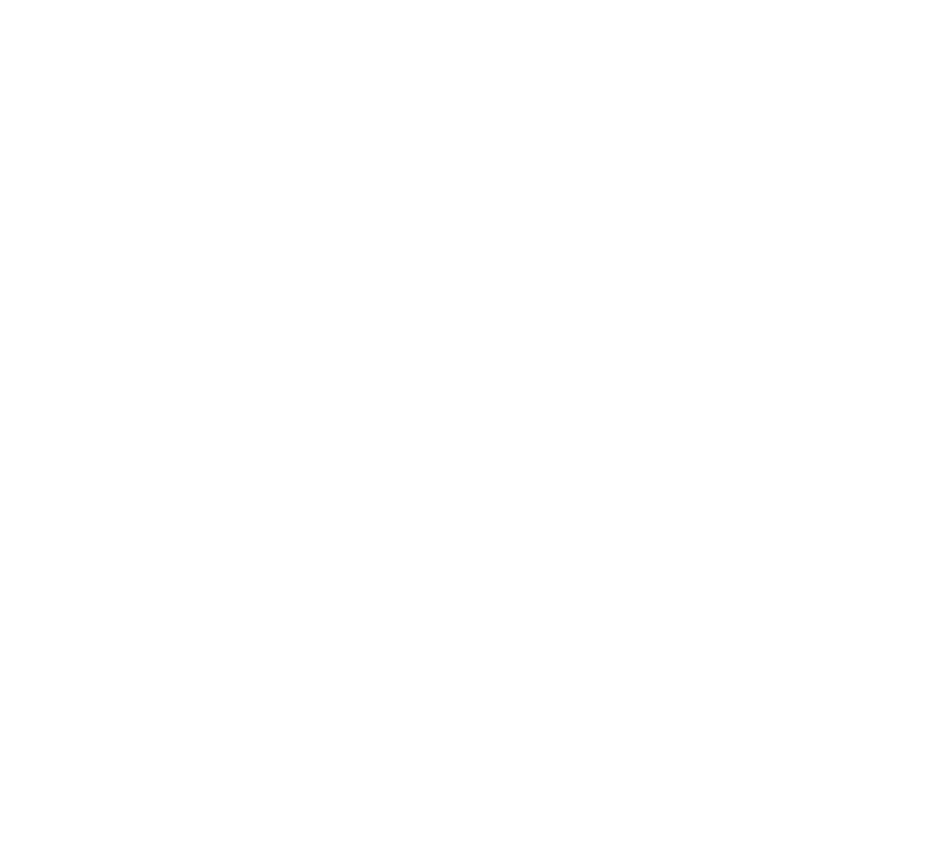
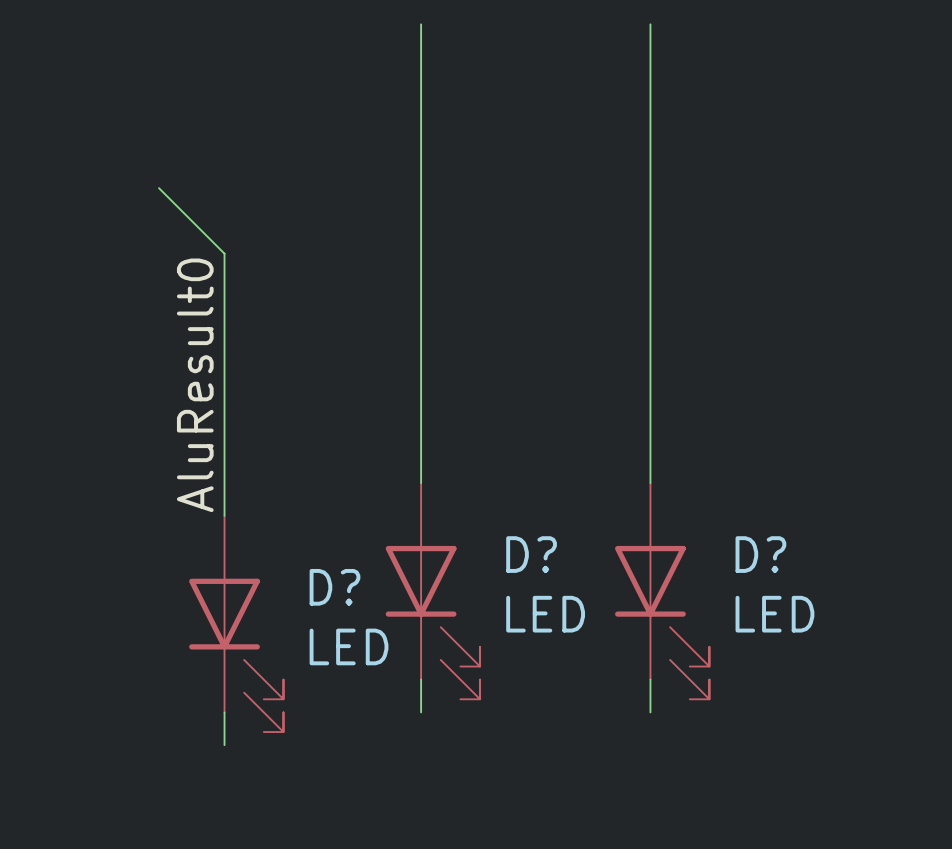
wire: none -> (421, 24) (421, 483)
wire: none -> (650, 24) (650, 483)
wire: none -> (158, 188) (224, 253) (224, 515)
label: none -> AluResult0 (195, 385)
D?: none -> LED (432, 591)
D?: none -> LED (662, 591)
D?: none -> LED (236, 623)
wire: none -> (421, 679) (421, 712)
wire: none -> (650, 679) (650, 712)
wire: none -> (224, 712) (224, 745)

